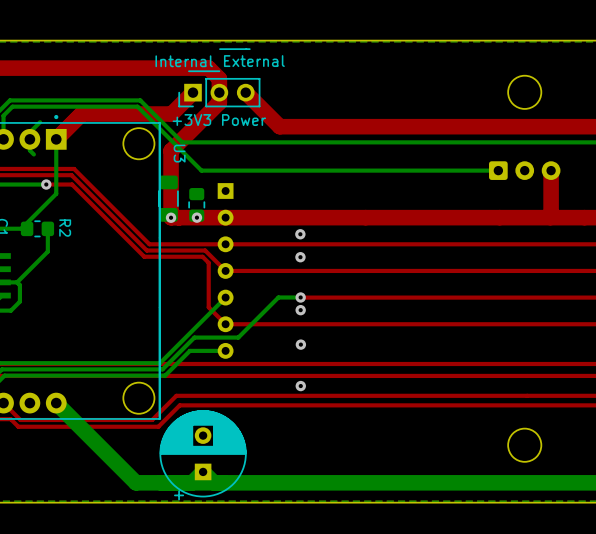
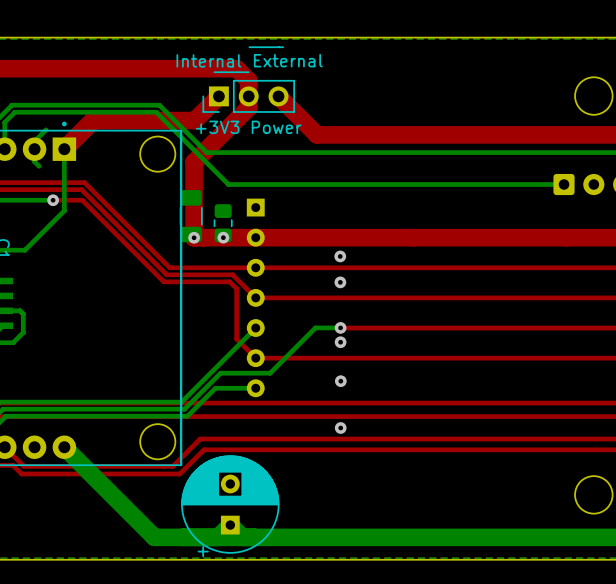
U3 name: U3 (179, 153) -> none
R2: (37, 228) -> none
bottom track: (47, 228) (47, 251) (17, 282) -> none

